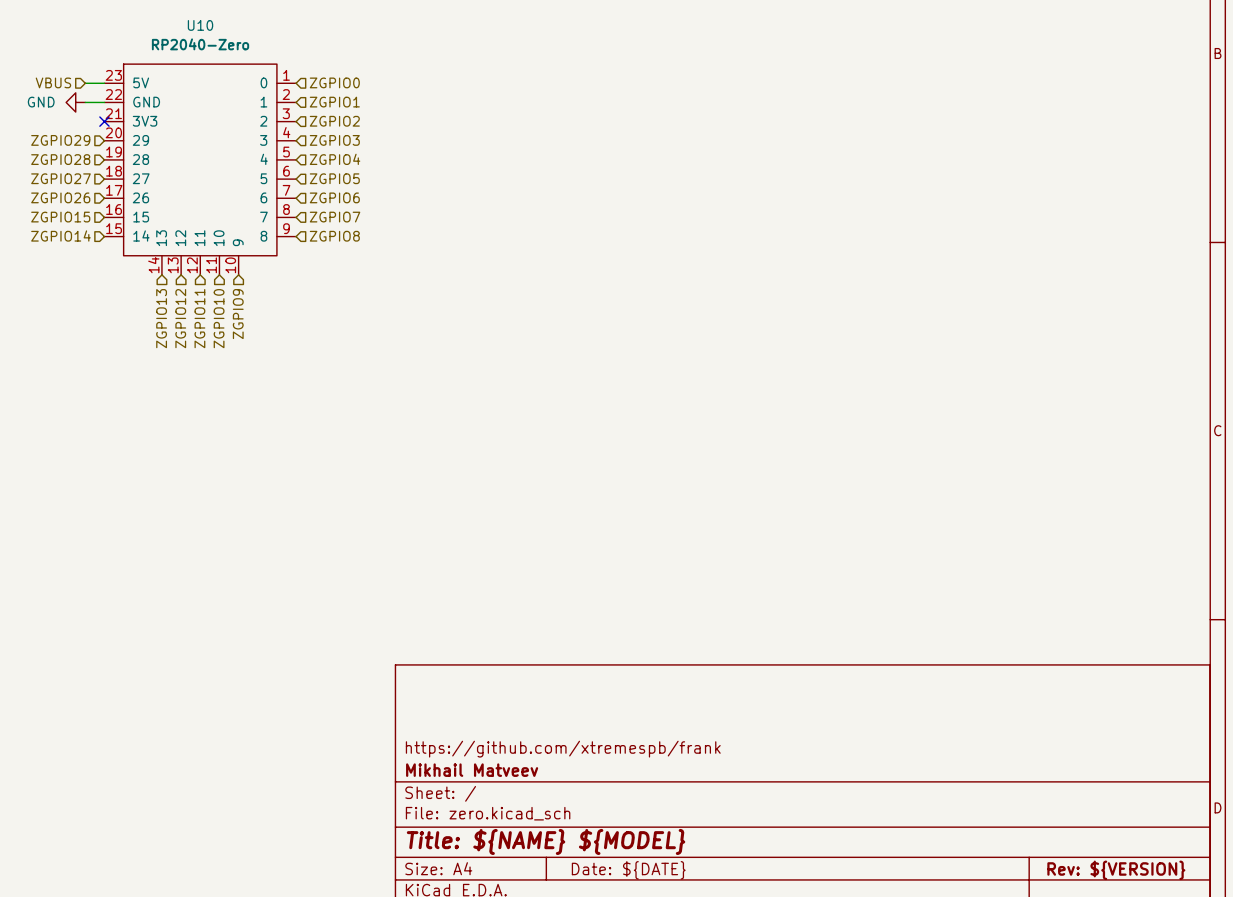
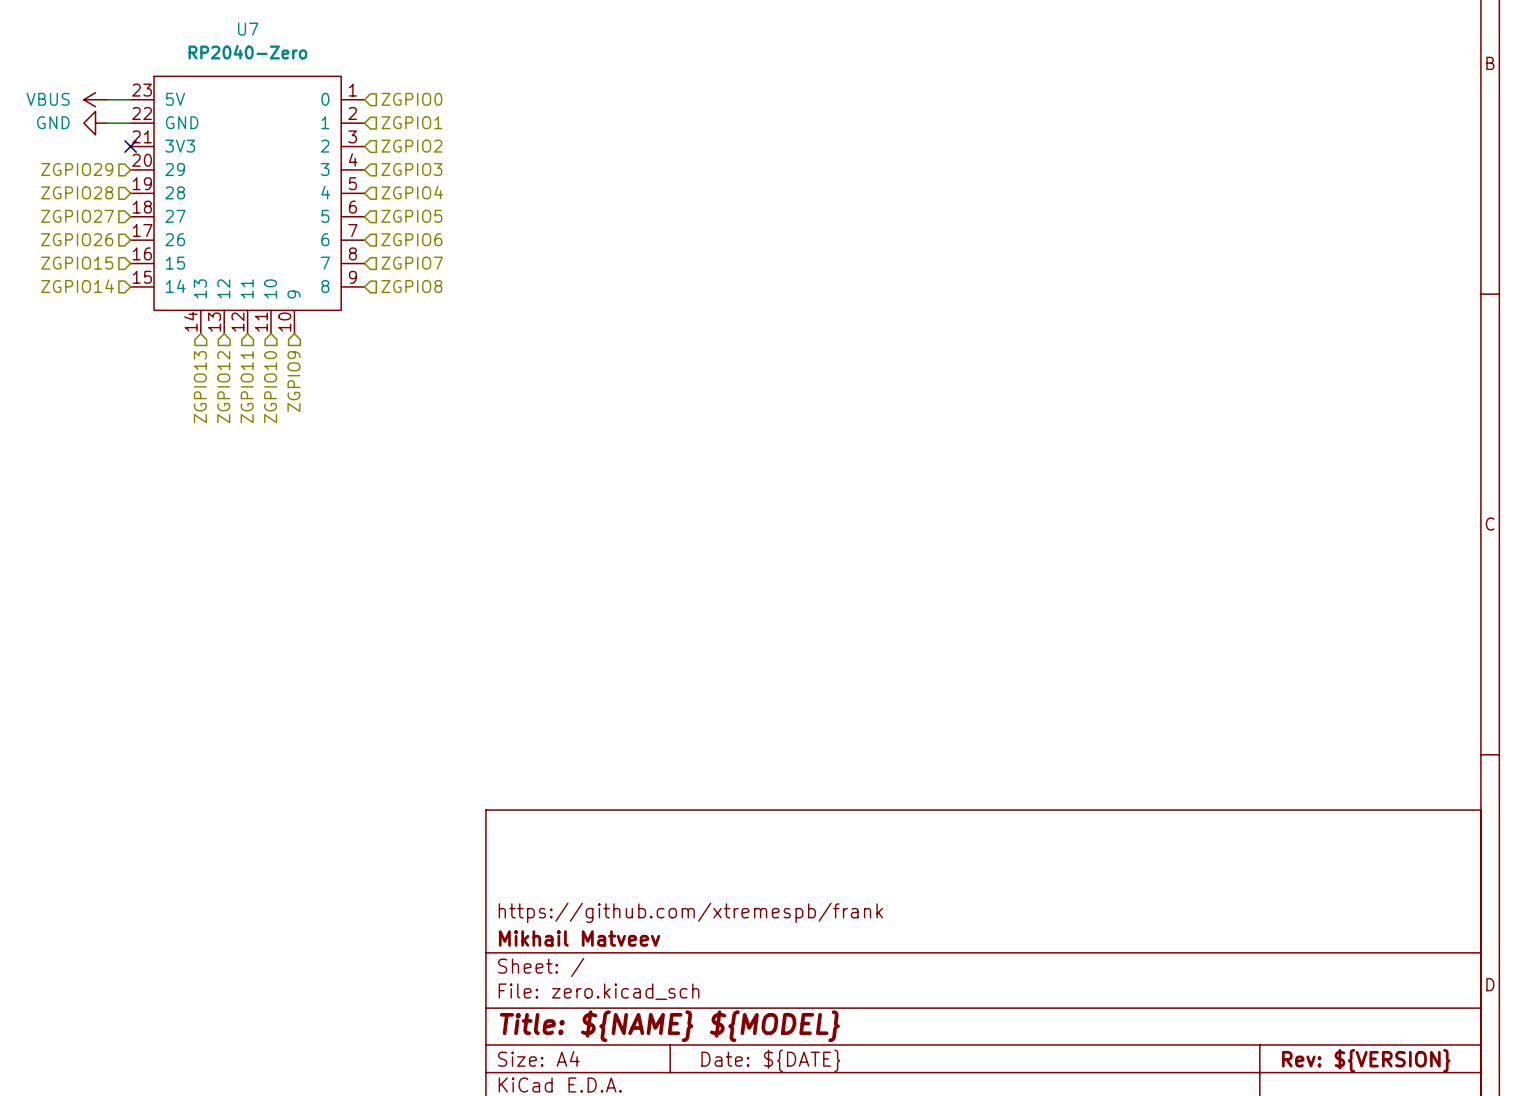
U10 name: U10 (200, 25) -> U7 (248, 29)
hierarchical label: VBUS (53, 82) -> none
power symbol: none -> VBUS (95, 99)

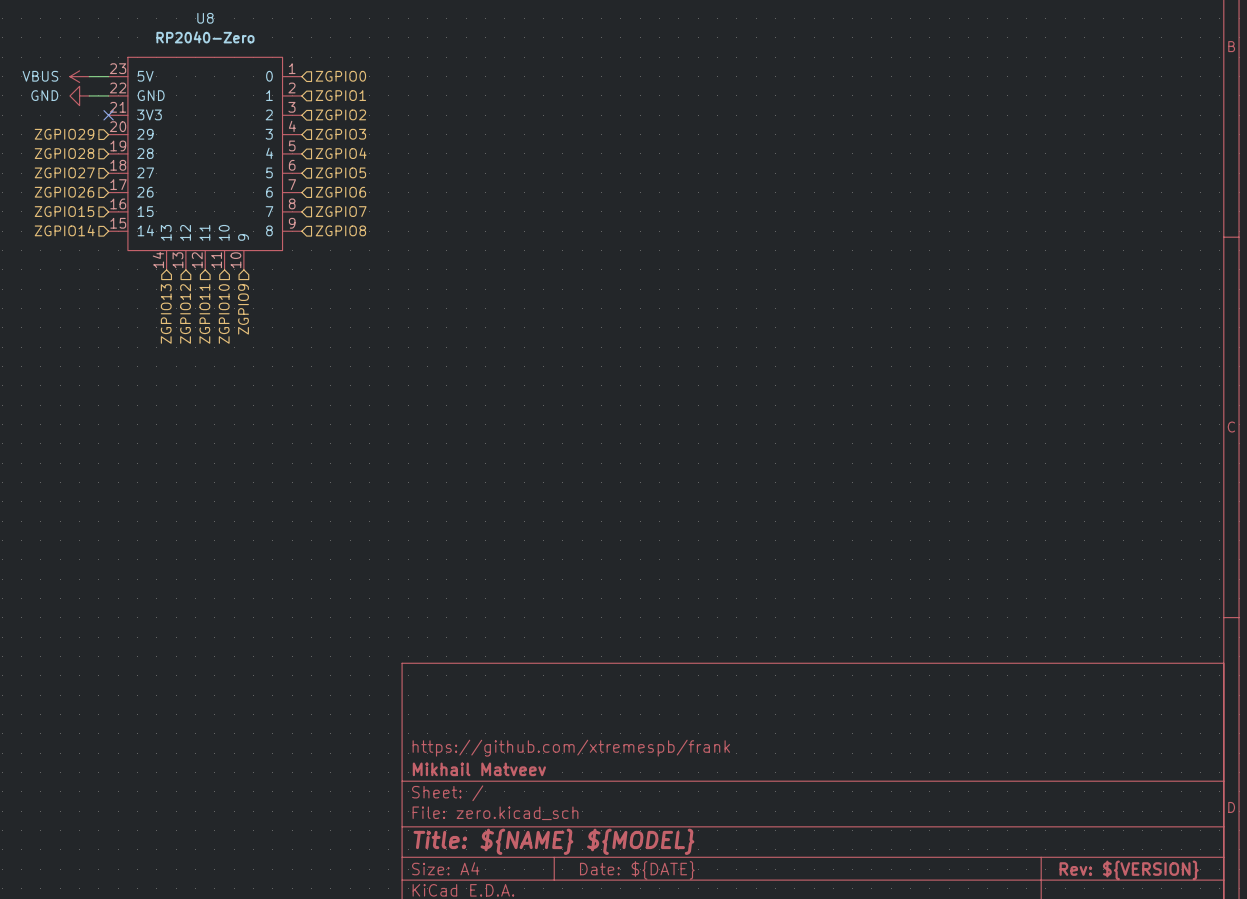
U7 name: U7 (248, 29) -> U8 (205, 18)

